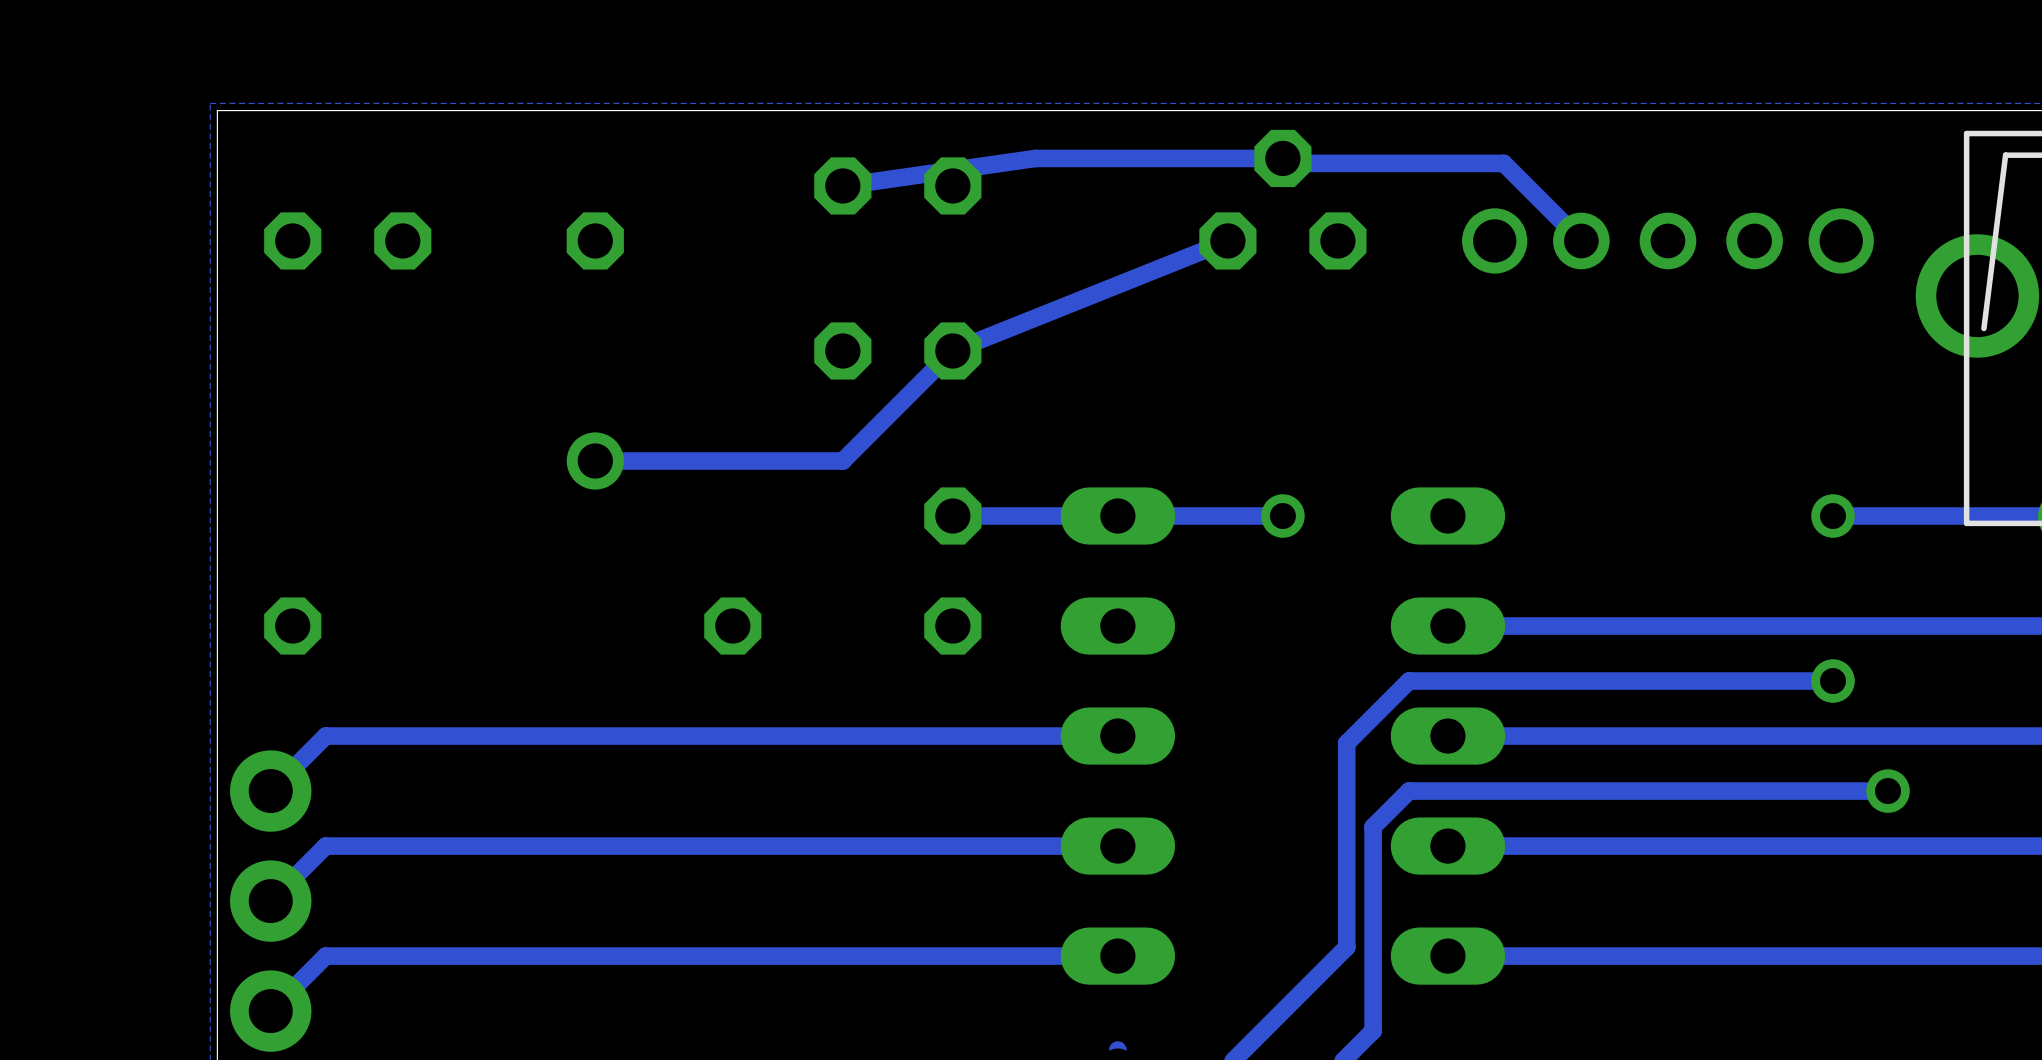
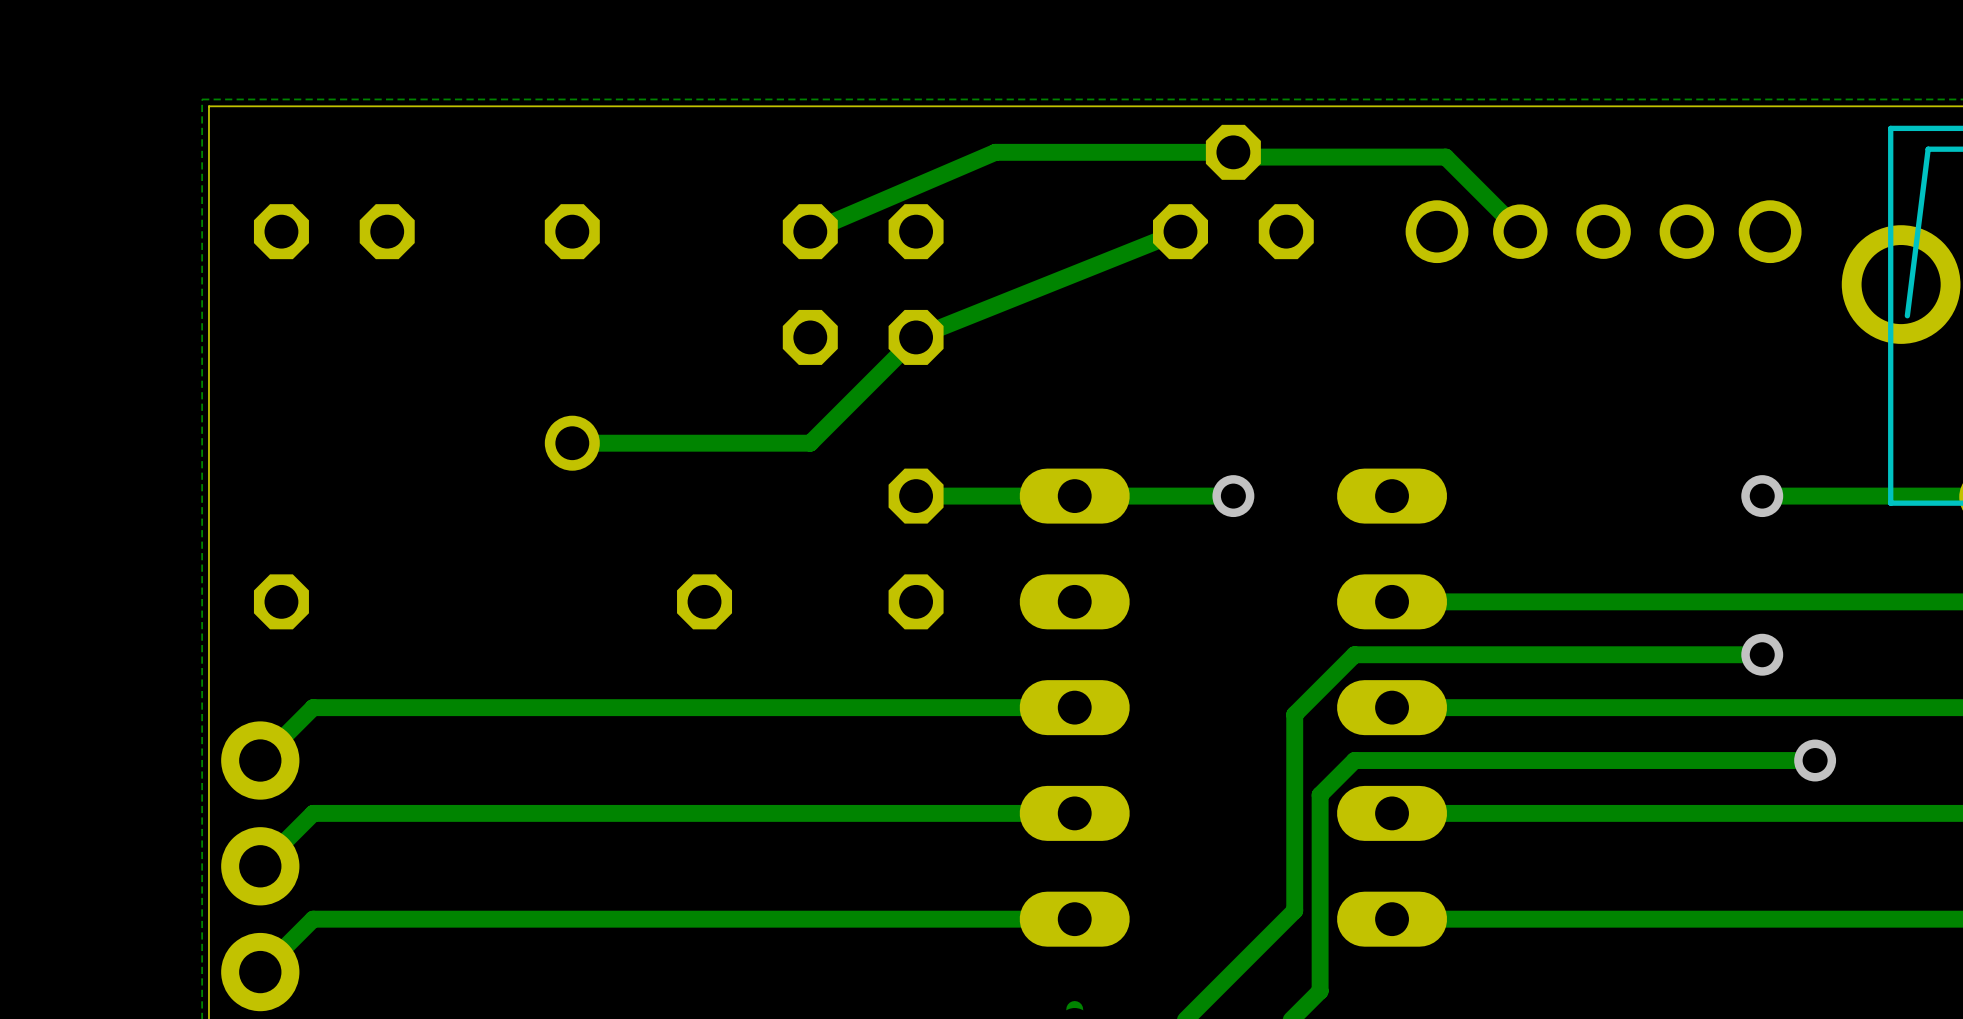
track: (1035, 158) (842, 185) -> (995, 152) (810, 231)
part position: (897, 185) -> (863, 231)

